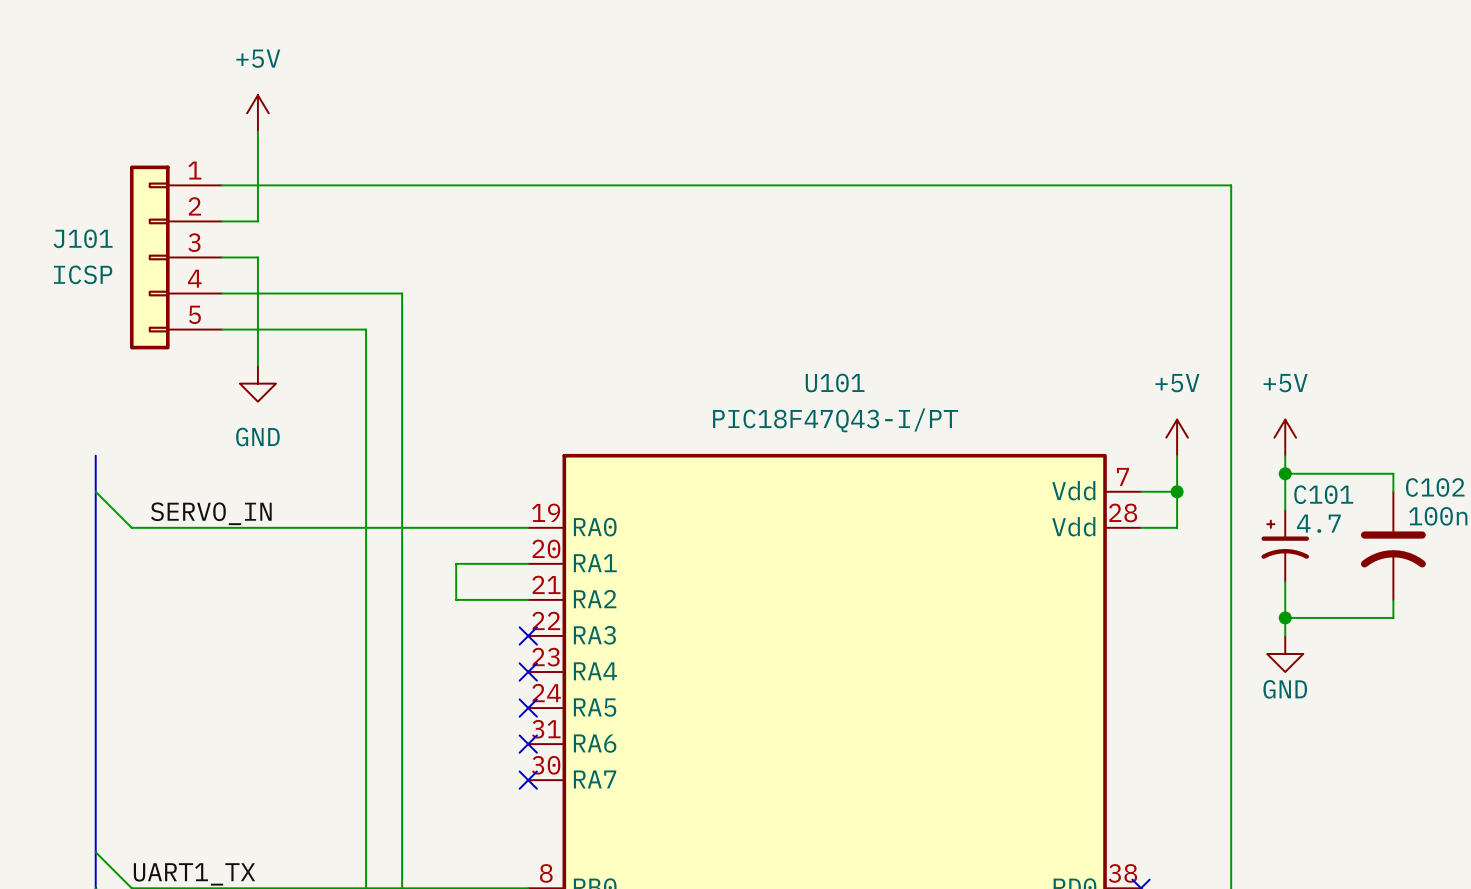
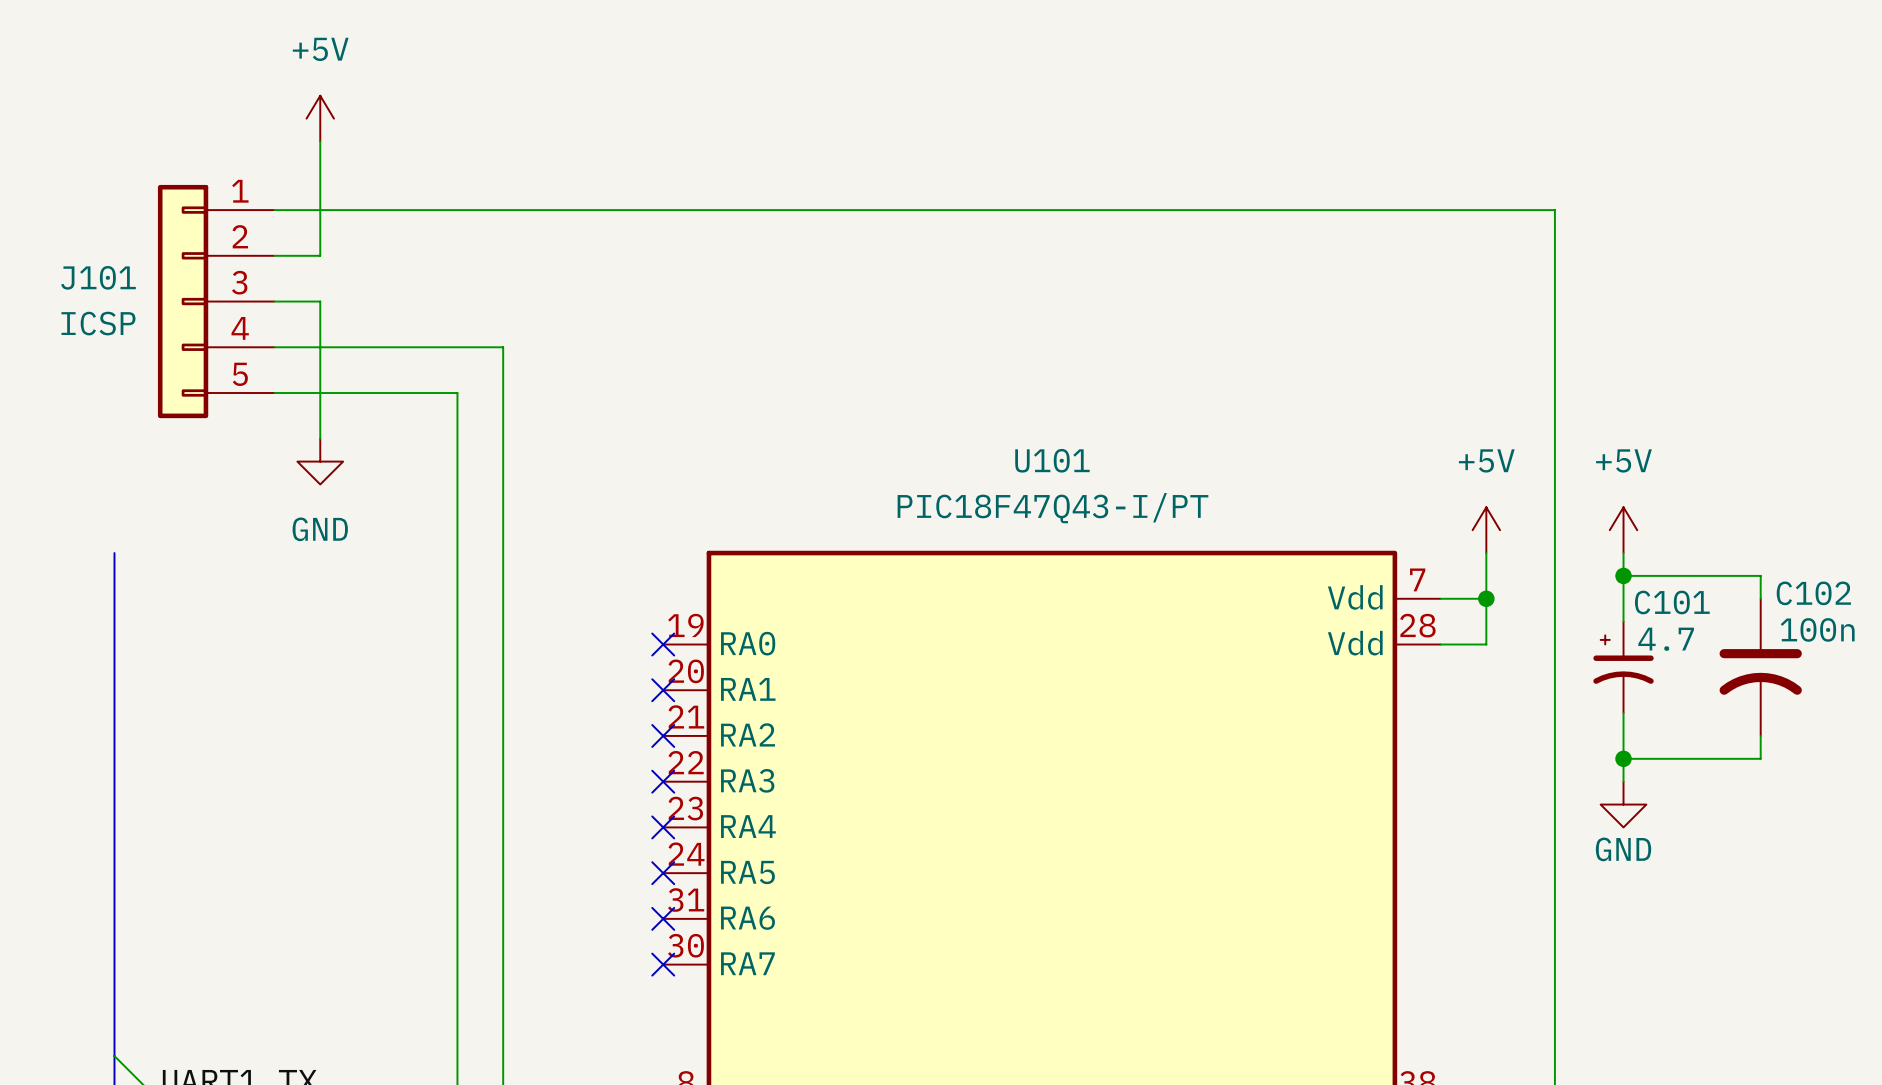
wire: (95, 491) (131, 527) (528, 527) -> none
label: SERVO_IN (211, 513) -> none
no-connect mark: none -> (663, 644)
wire: (528, 563) (456, 563) (456, 599) (528, 599) -> none
no-connect mark: none -> (663, 690)
no-connect mark: none -> (663, 735)

